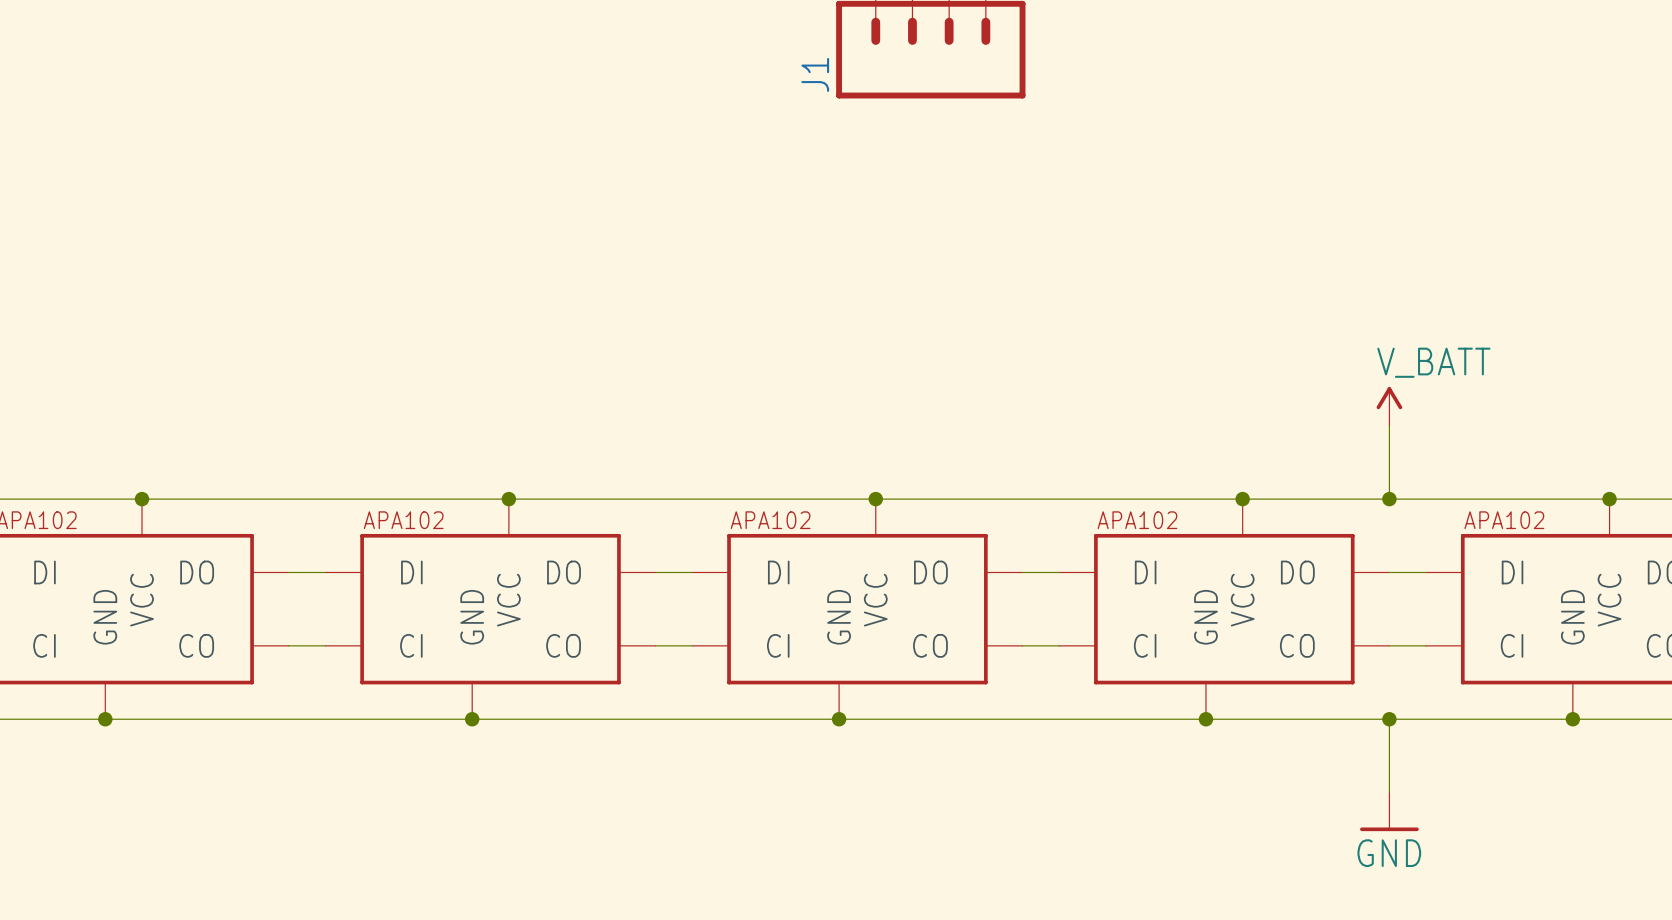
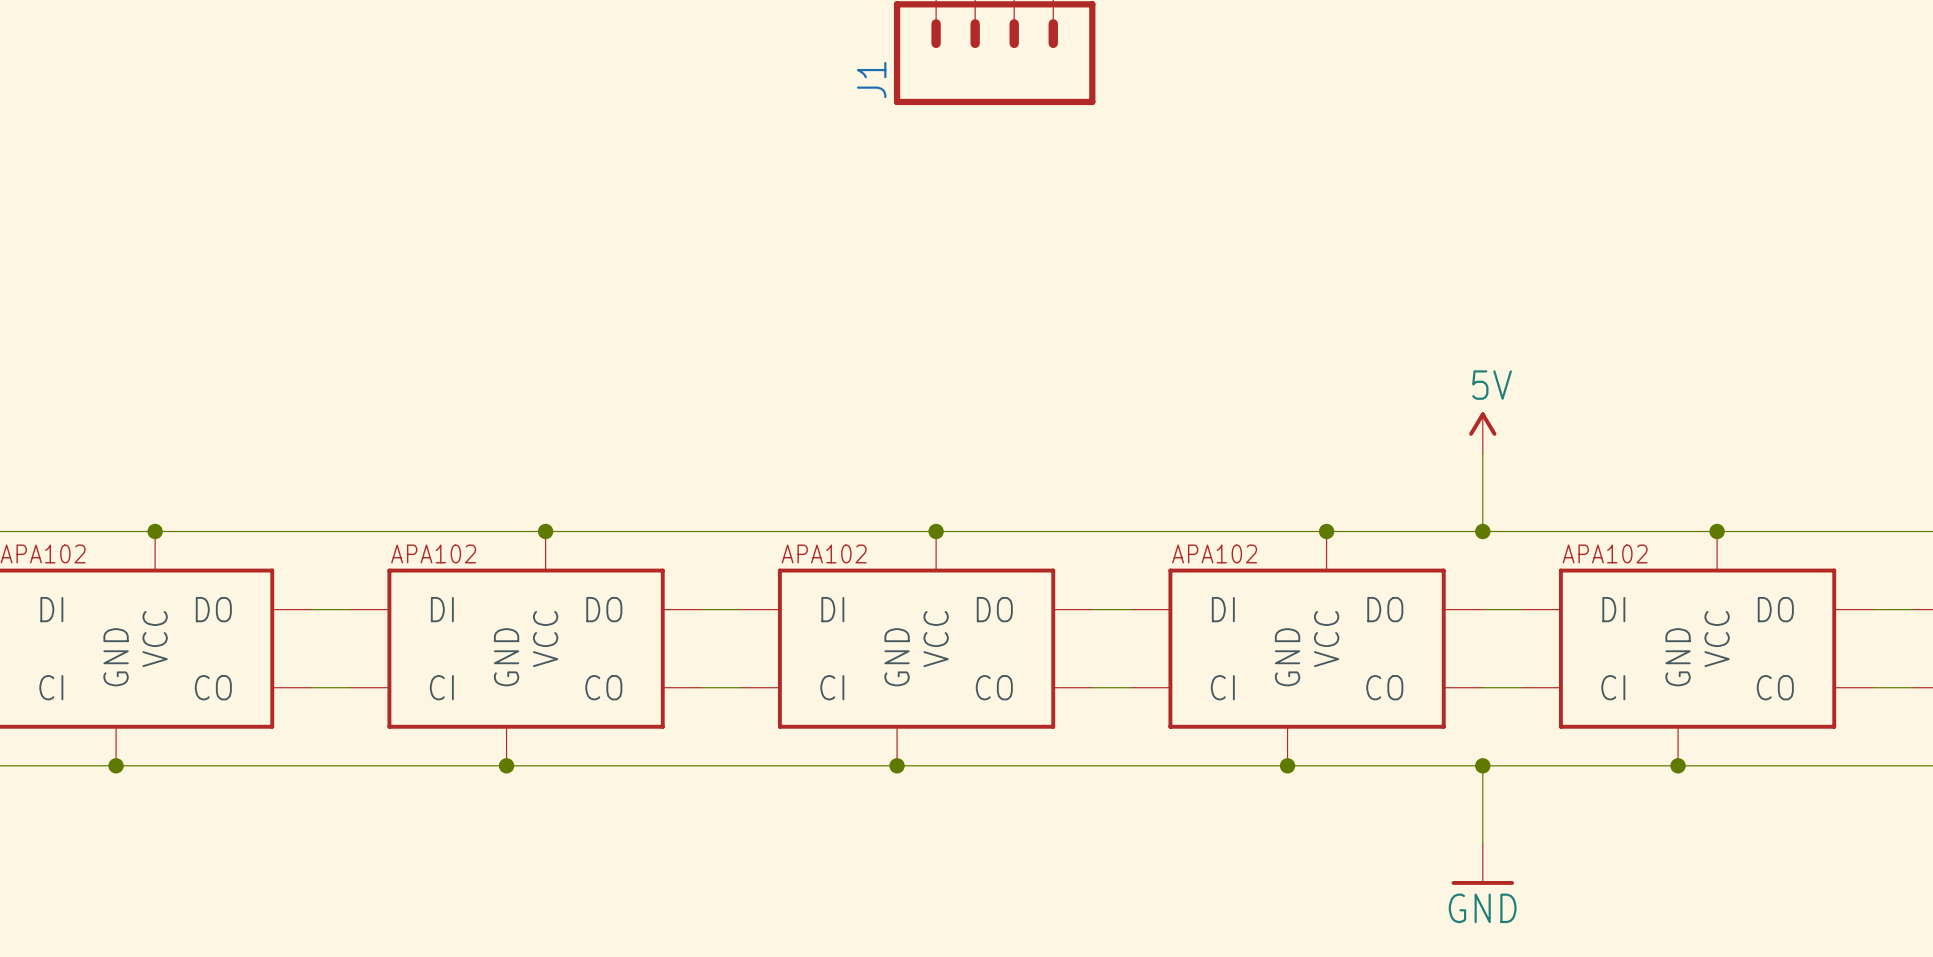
power symbol: V_BATT (1389, 406) -> 5V (1482, 432)

